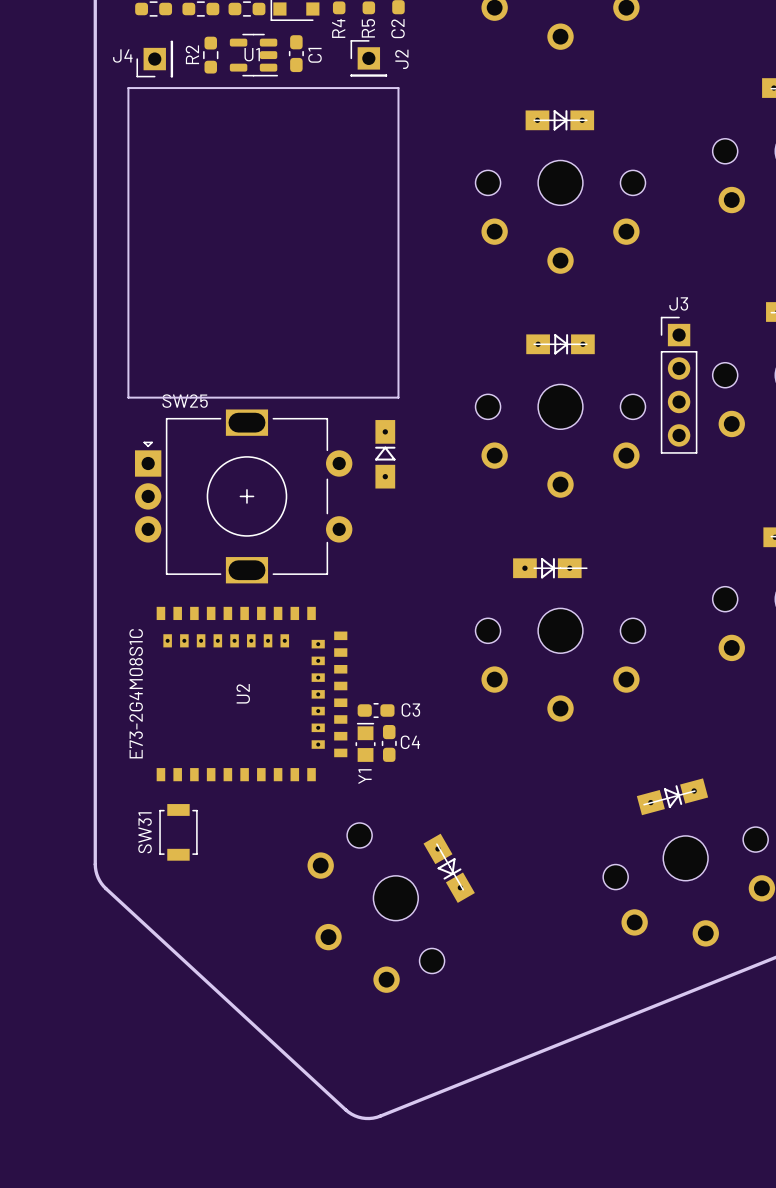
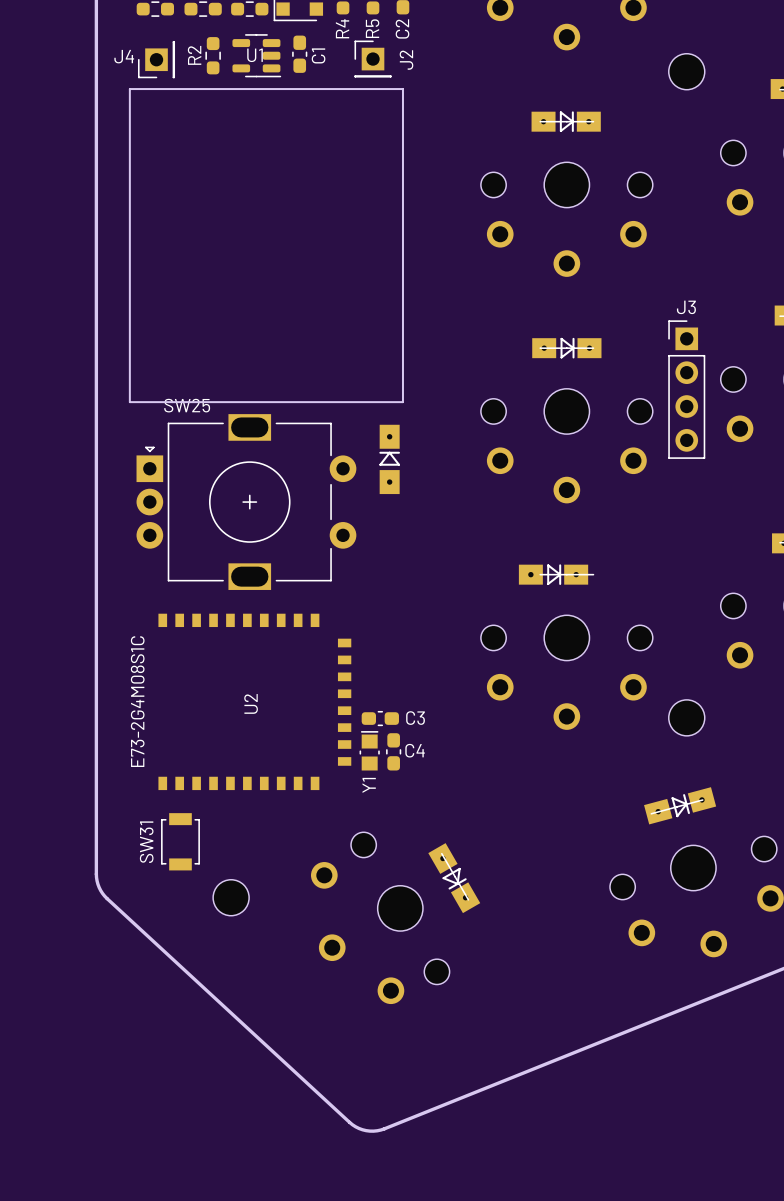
part: none -> (686, 71)
U2 footprint: [156, 606, 348, 782] -> [158, 613, 352, 791]
part: none -> (686, 717)
part: none -> (231, 897)

